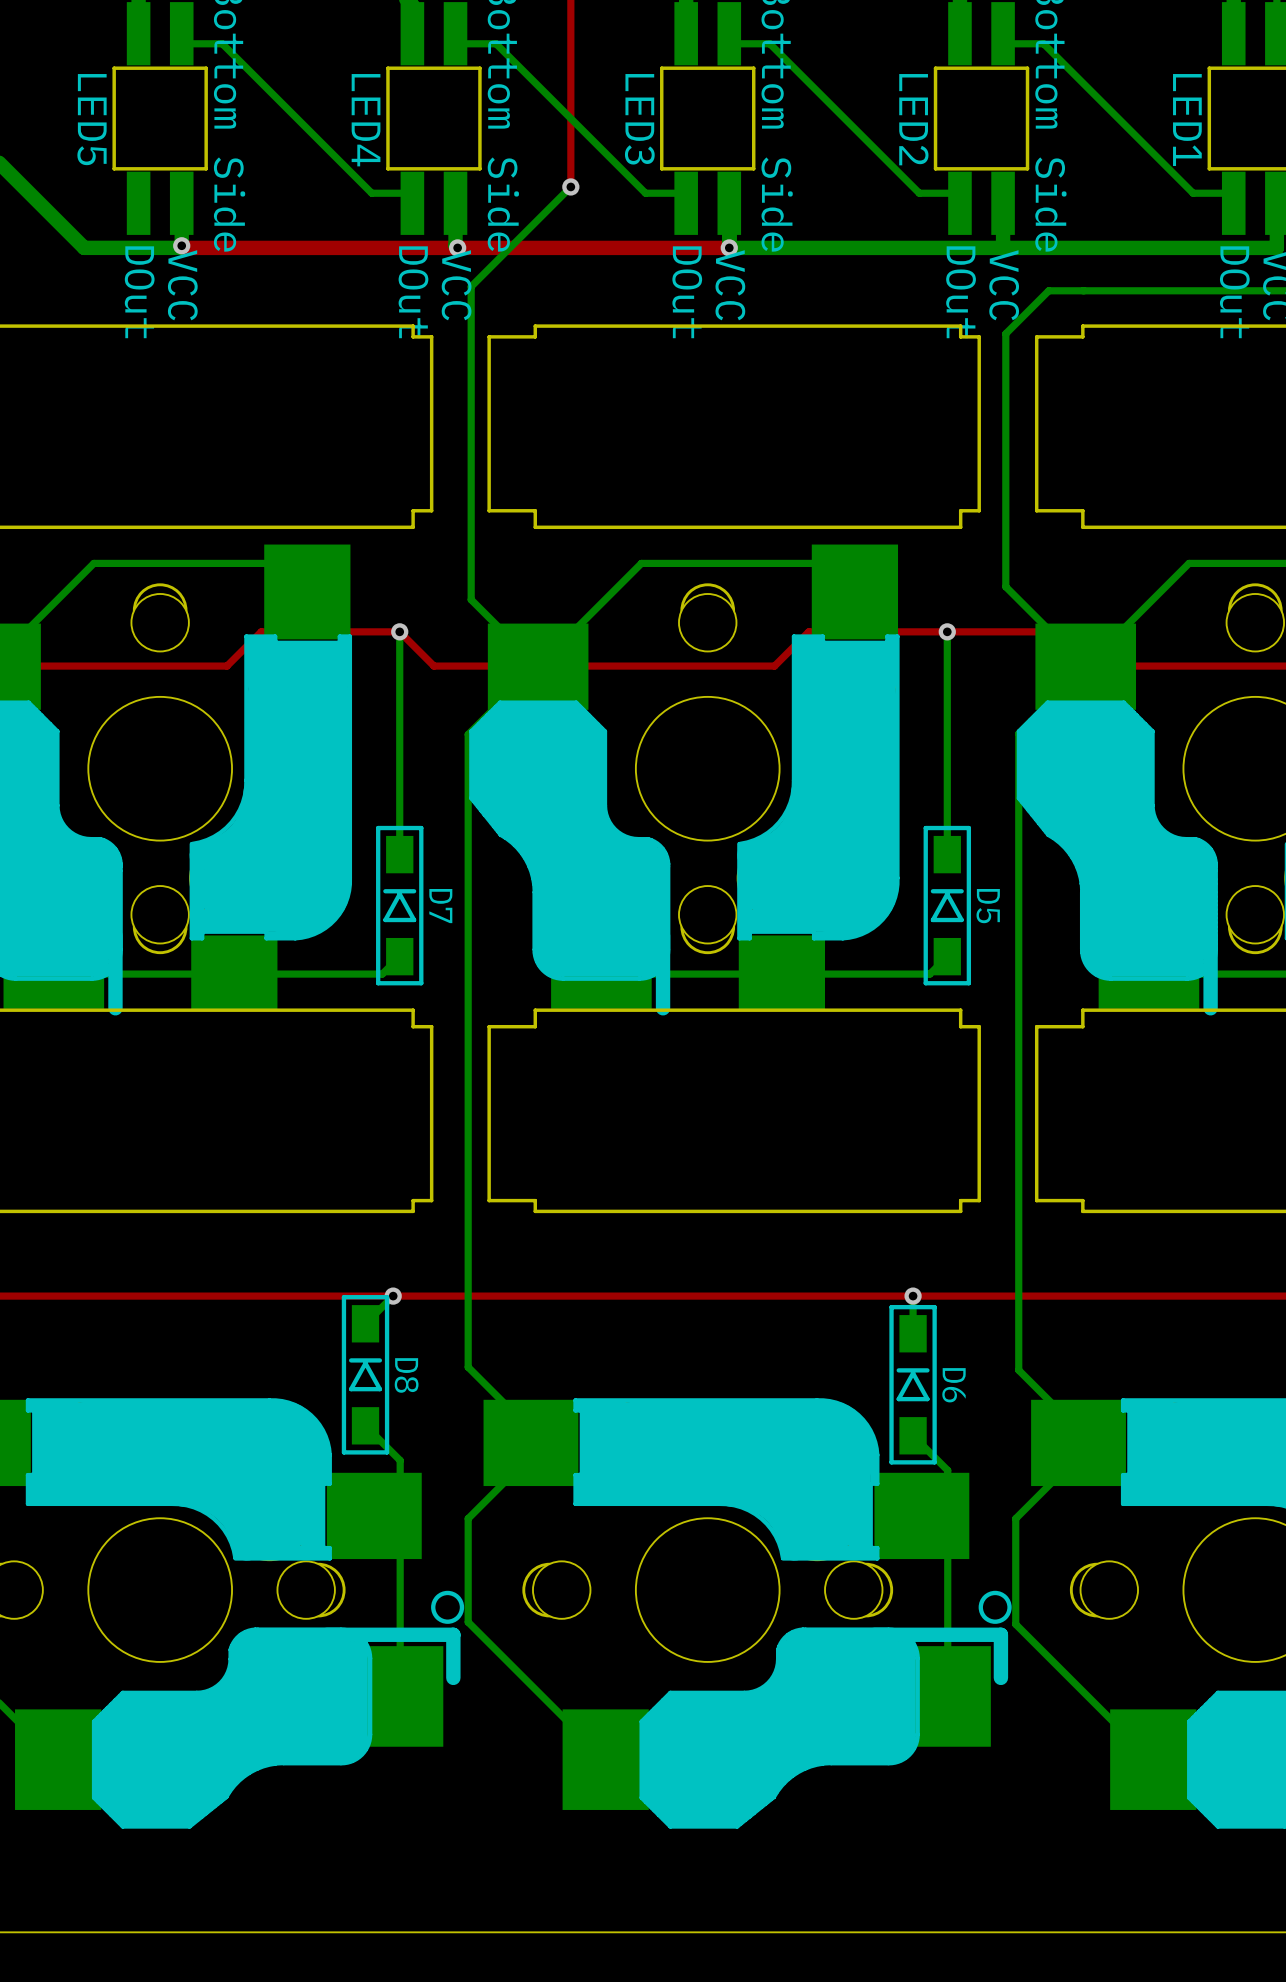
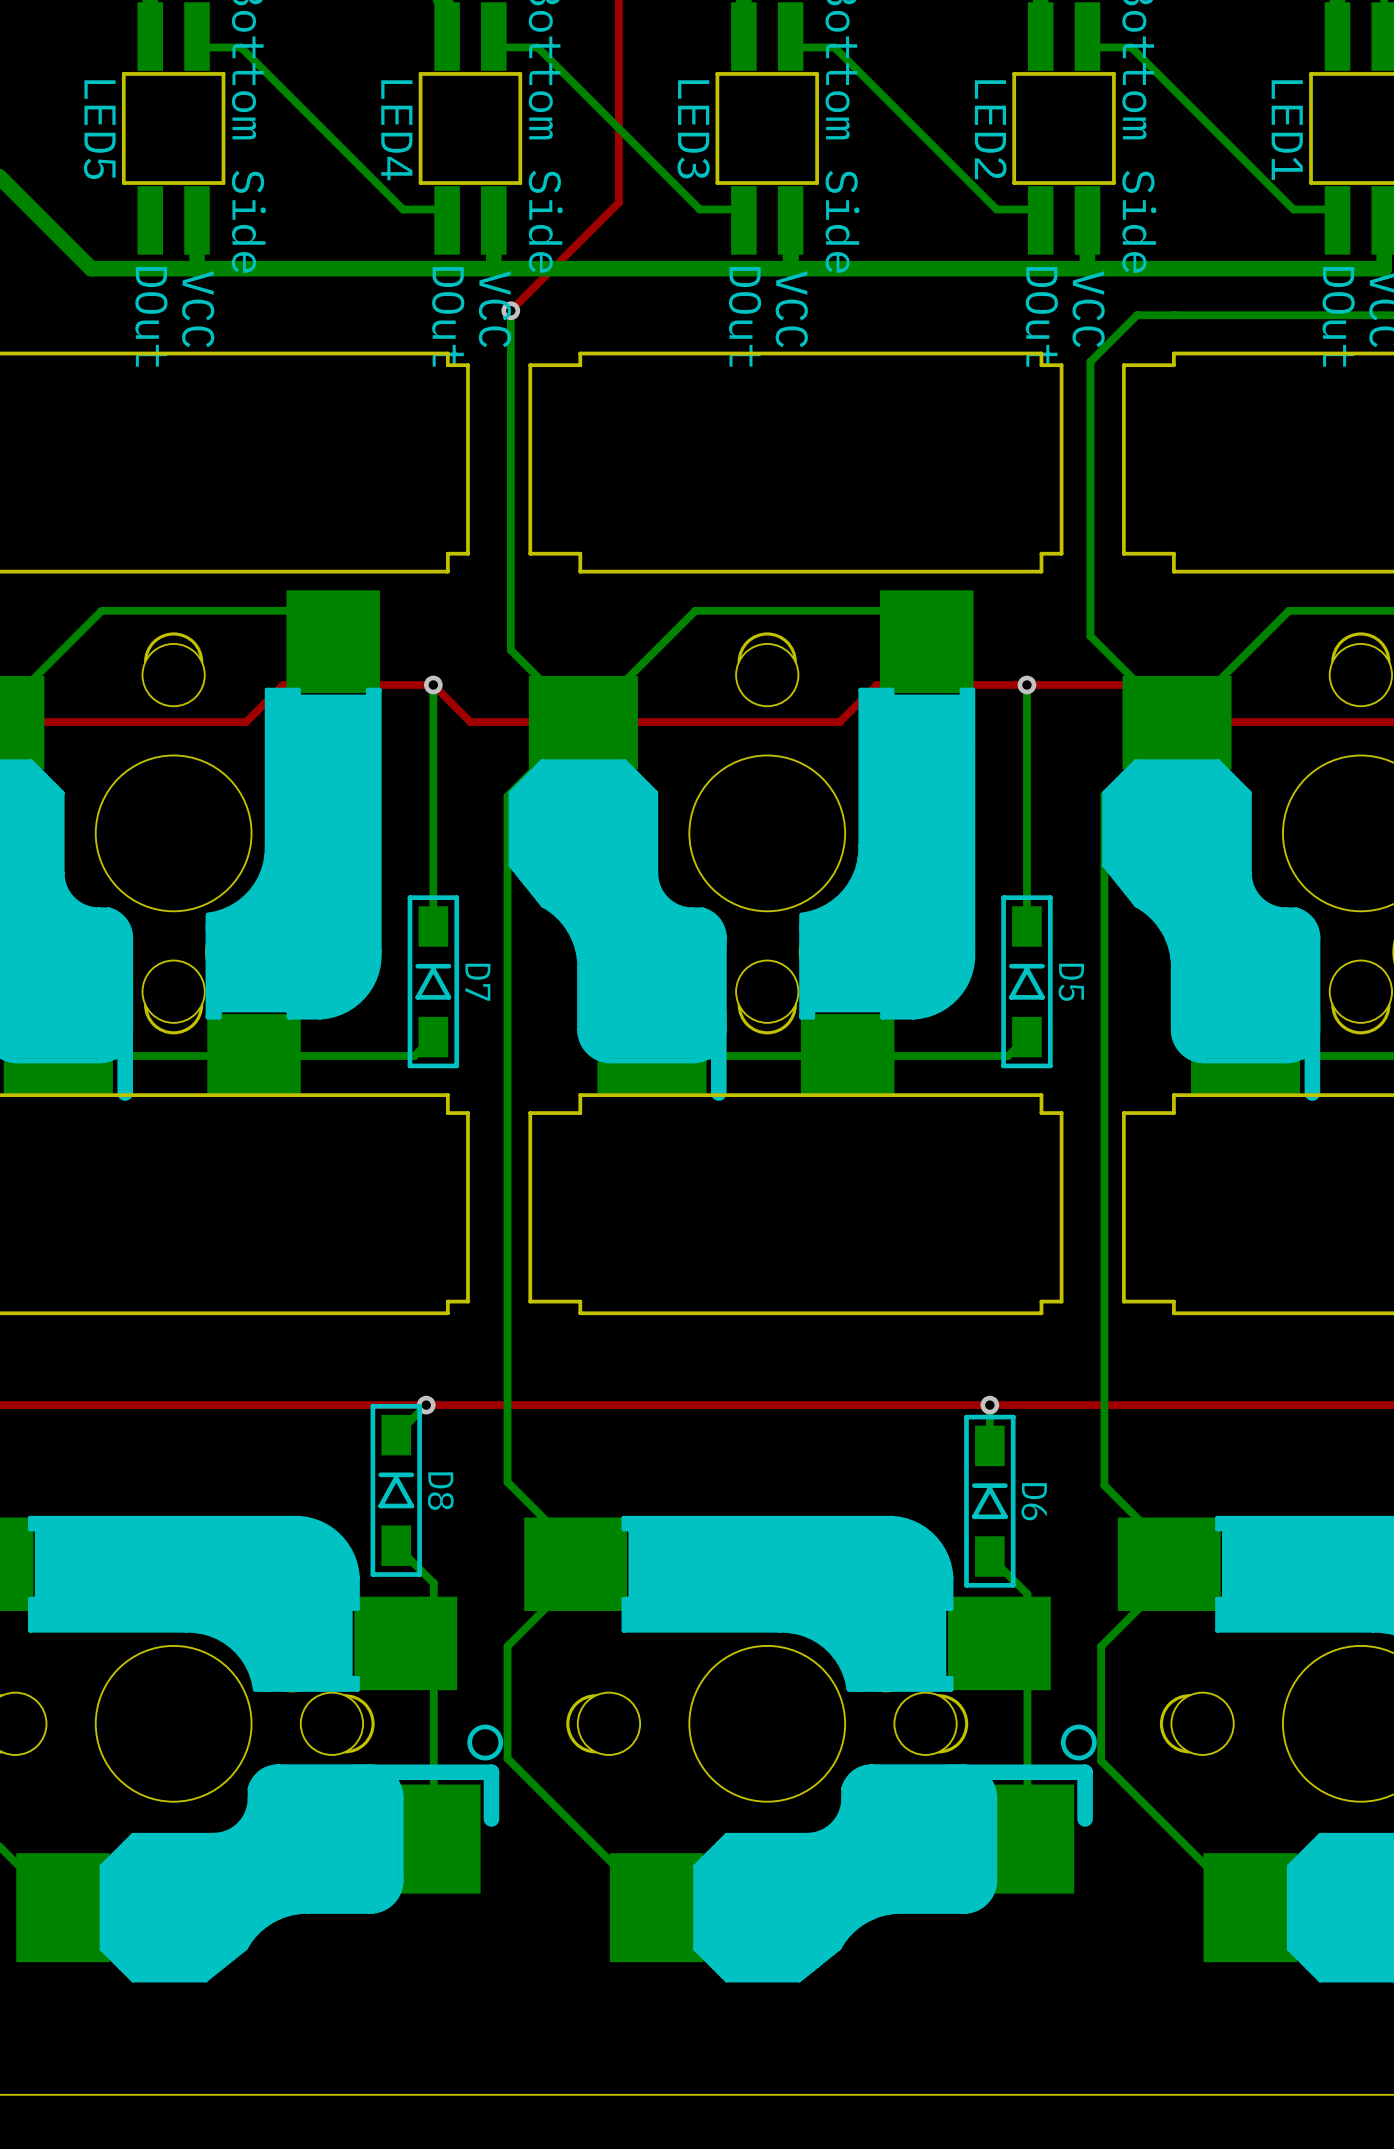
top track: none -> (618, 202) (510, 310)
bottom track: (570, 186) (471, 286) -> none
via: (570, 186) -> none
top track: (181, 245) (183, 247) (729, 247) -> none
via: (181, 245) -> none
via position: (457, 247) -> (510, 310)
via: (729, 247) -> none

